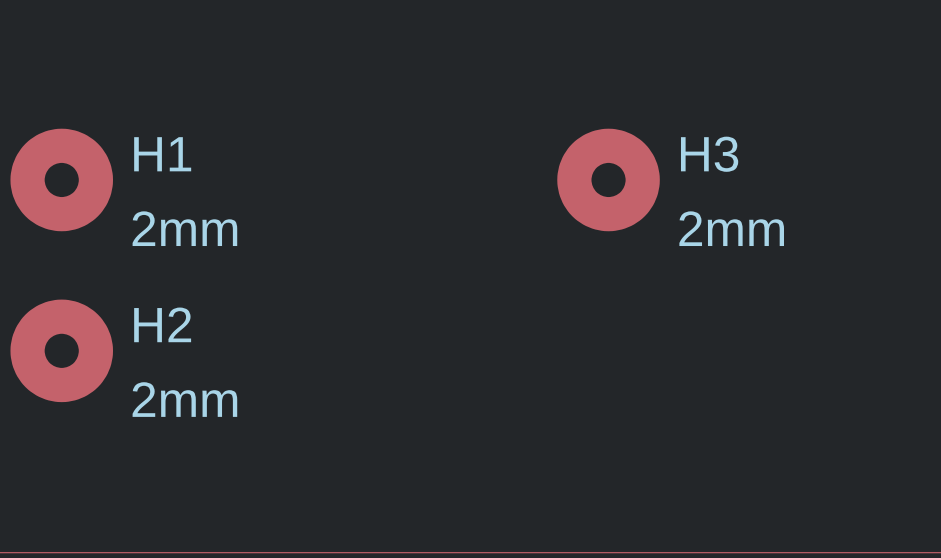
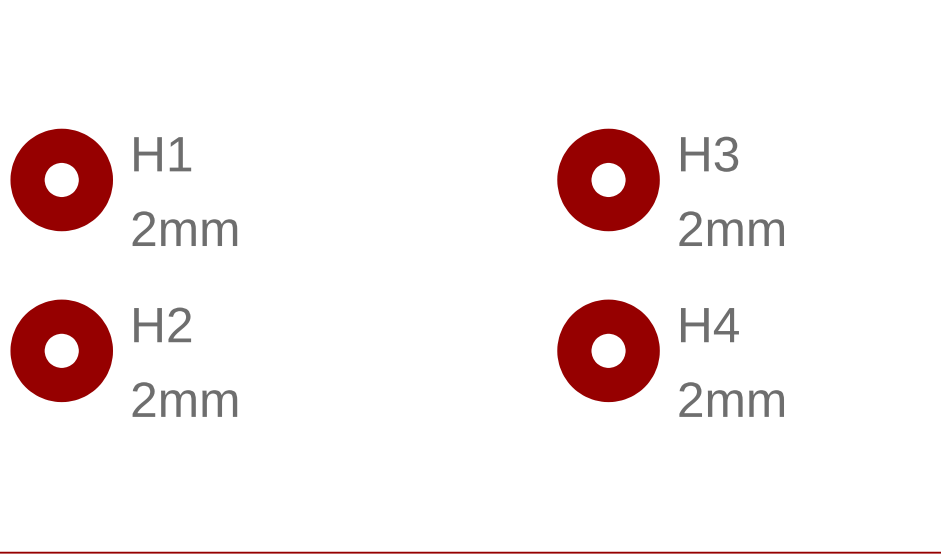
H4: none -> 2mm (608, 350)

